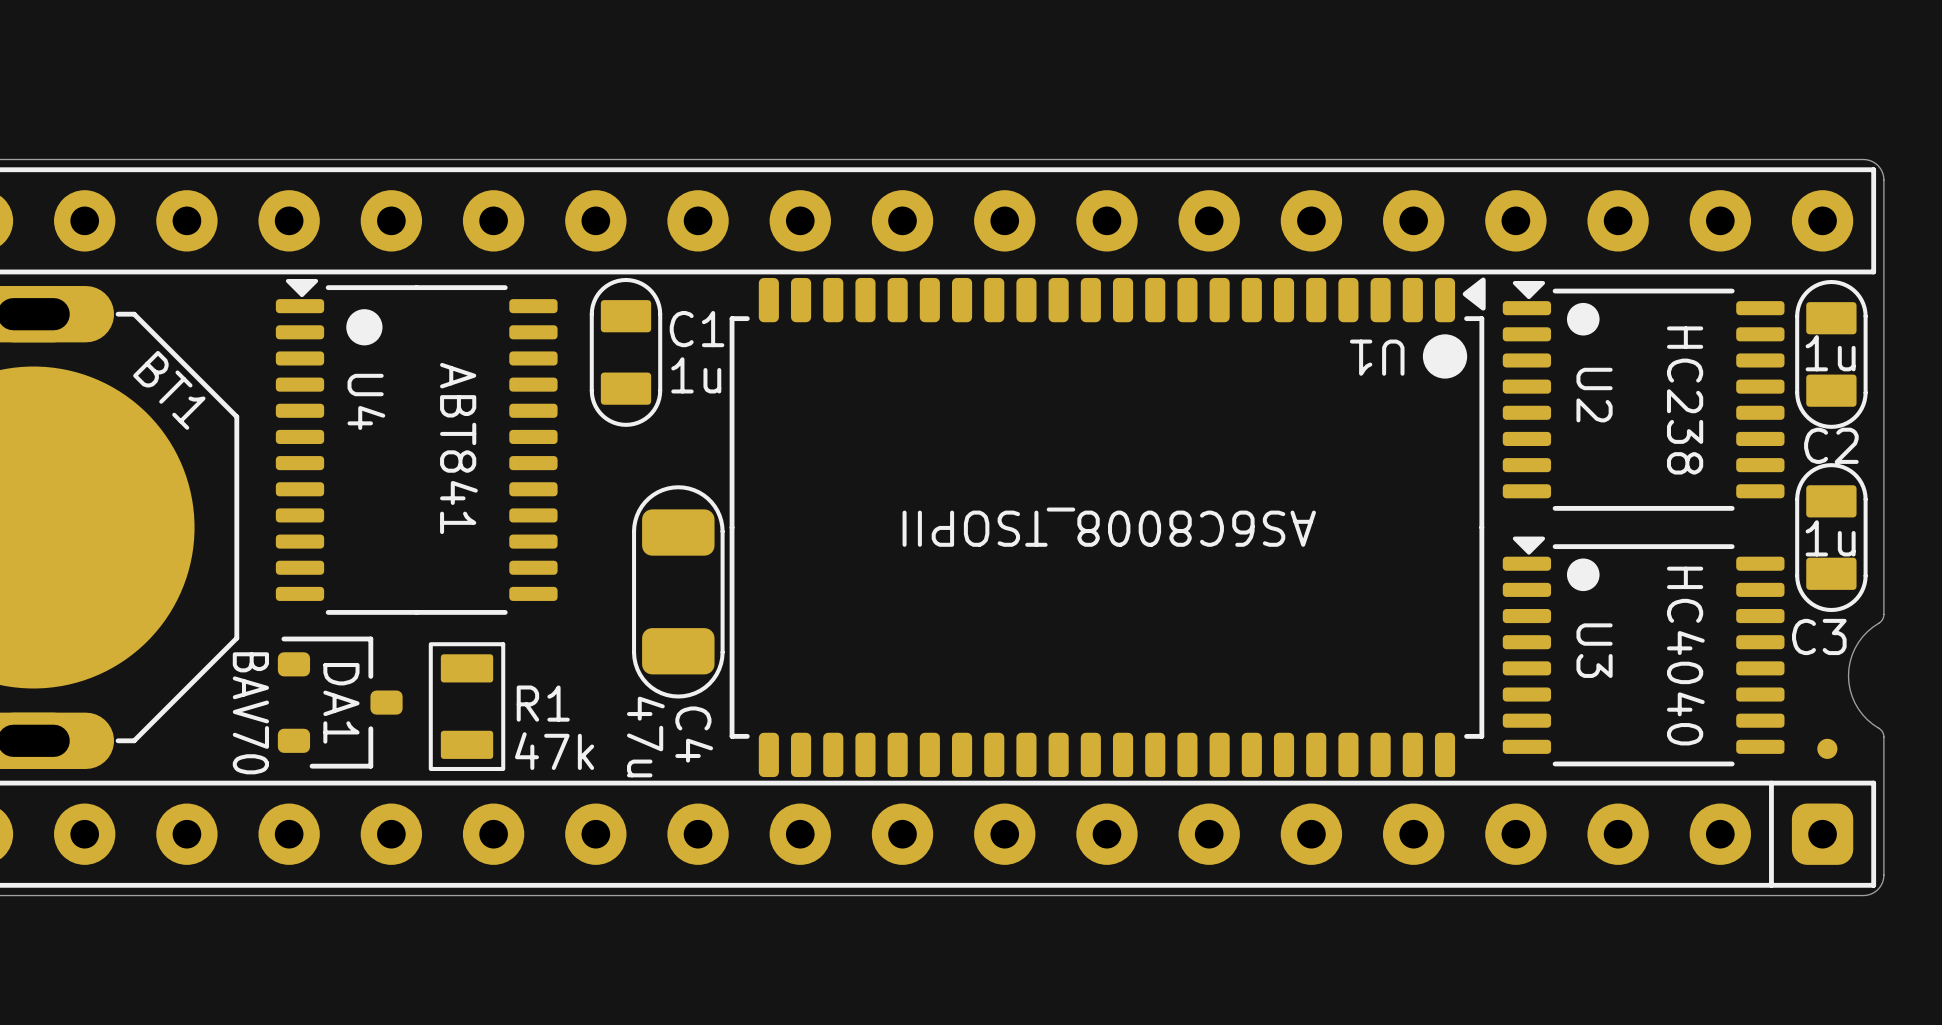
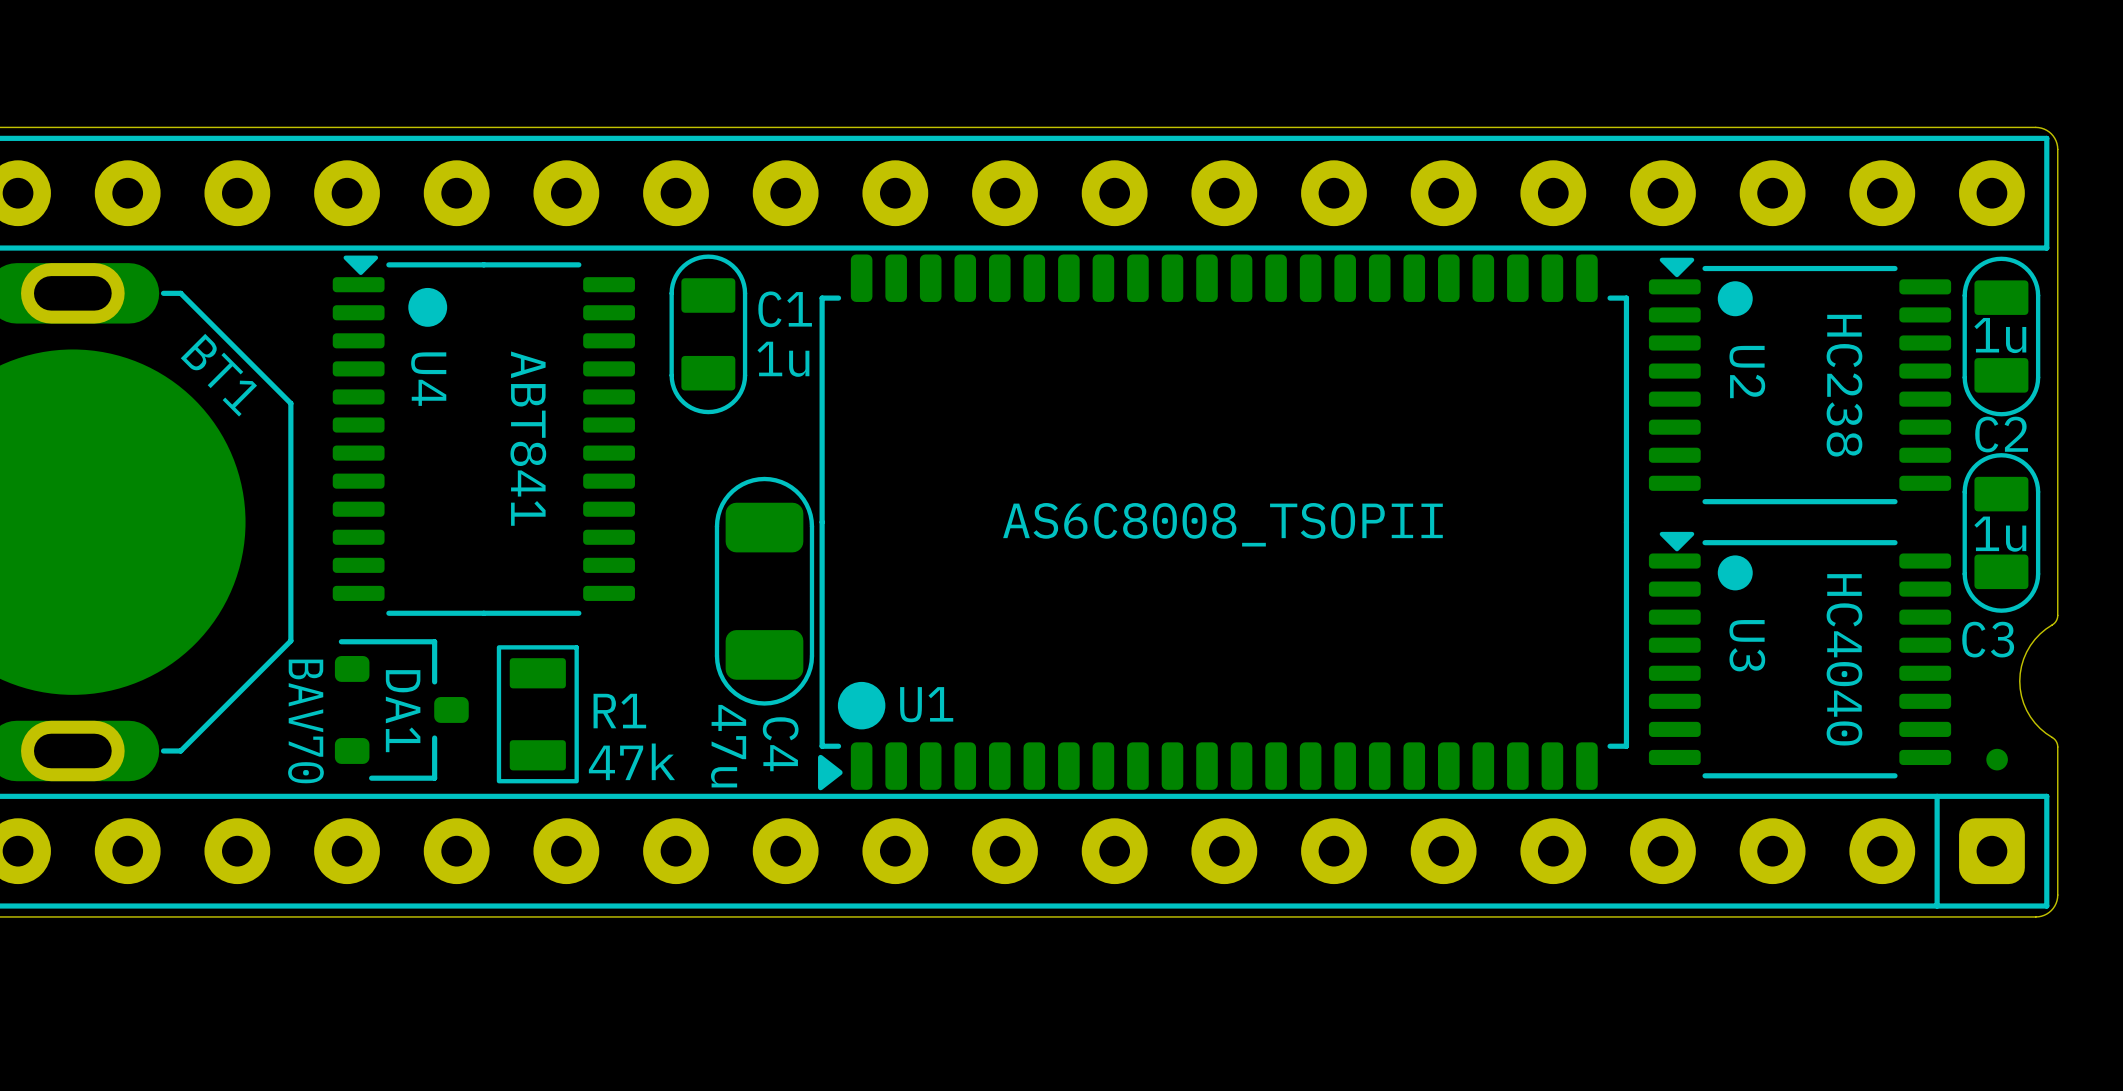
U1 rotation: 0° (1107, 527) -> 180° (1223, 522)

